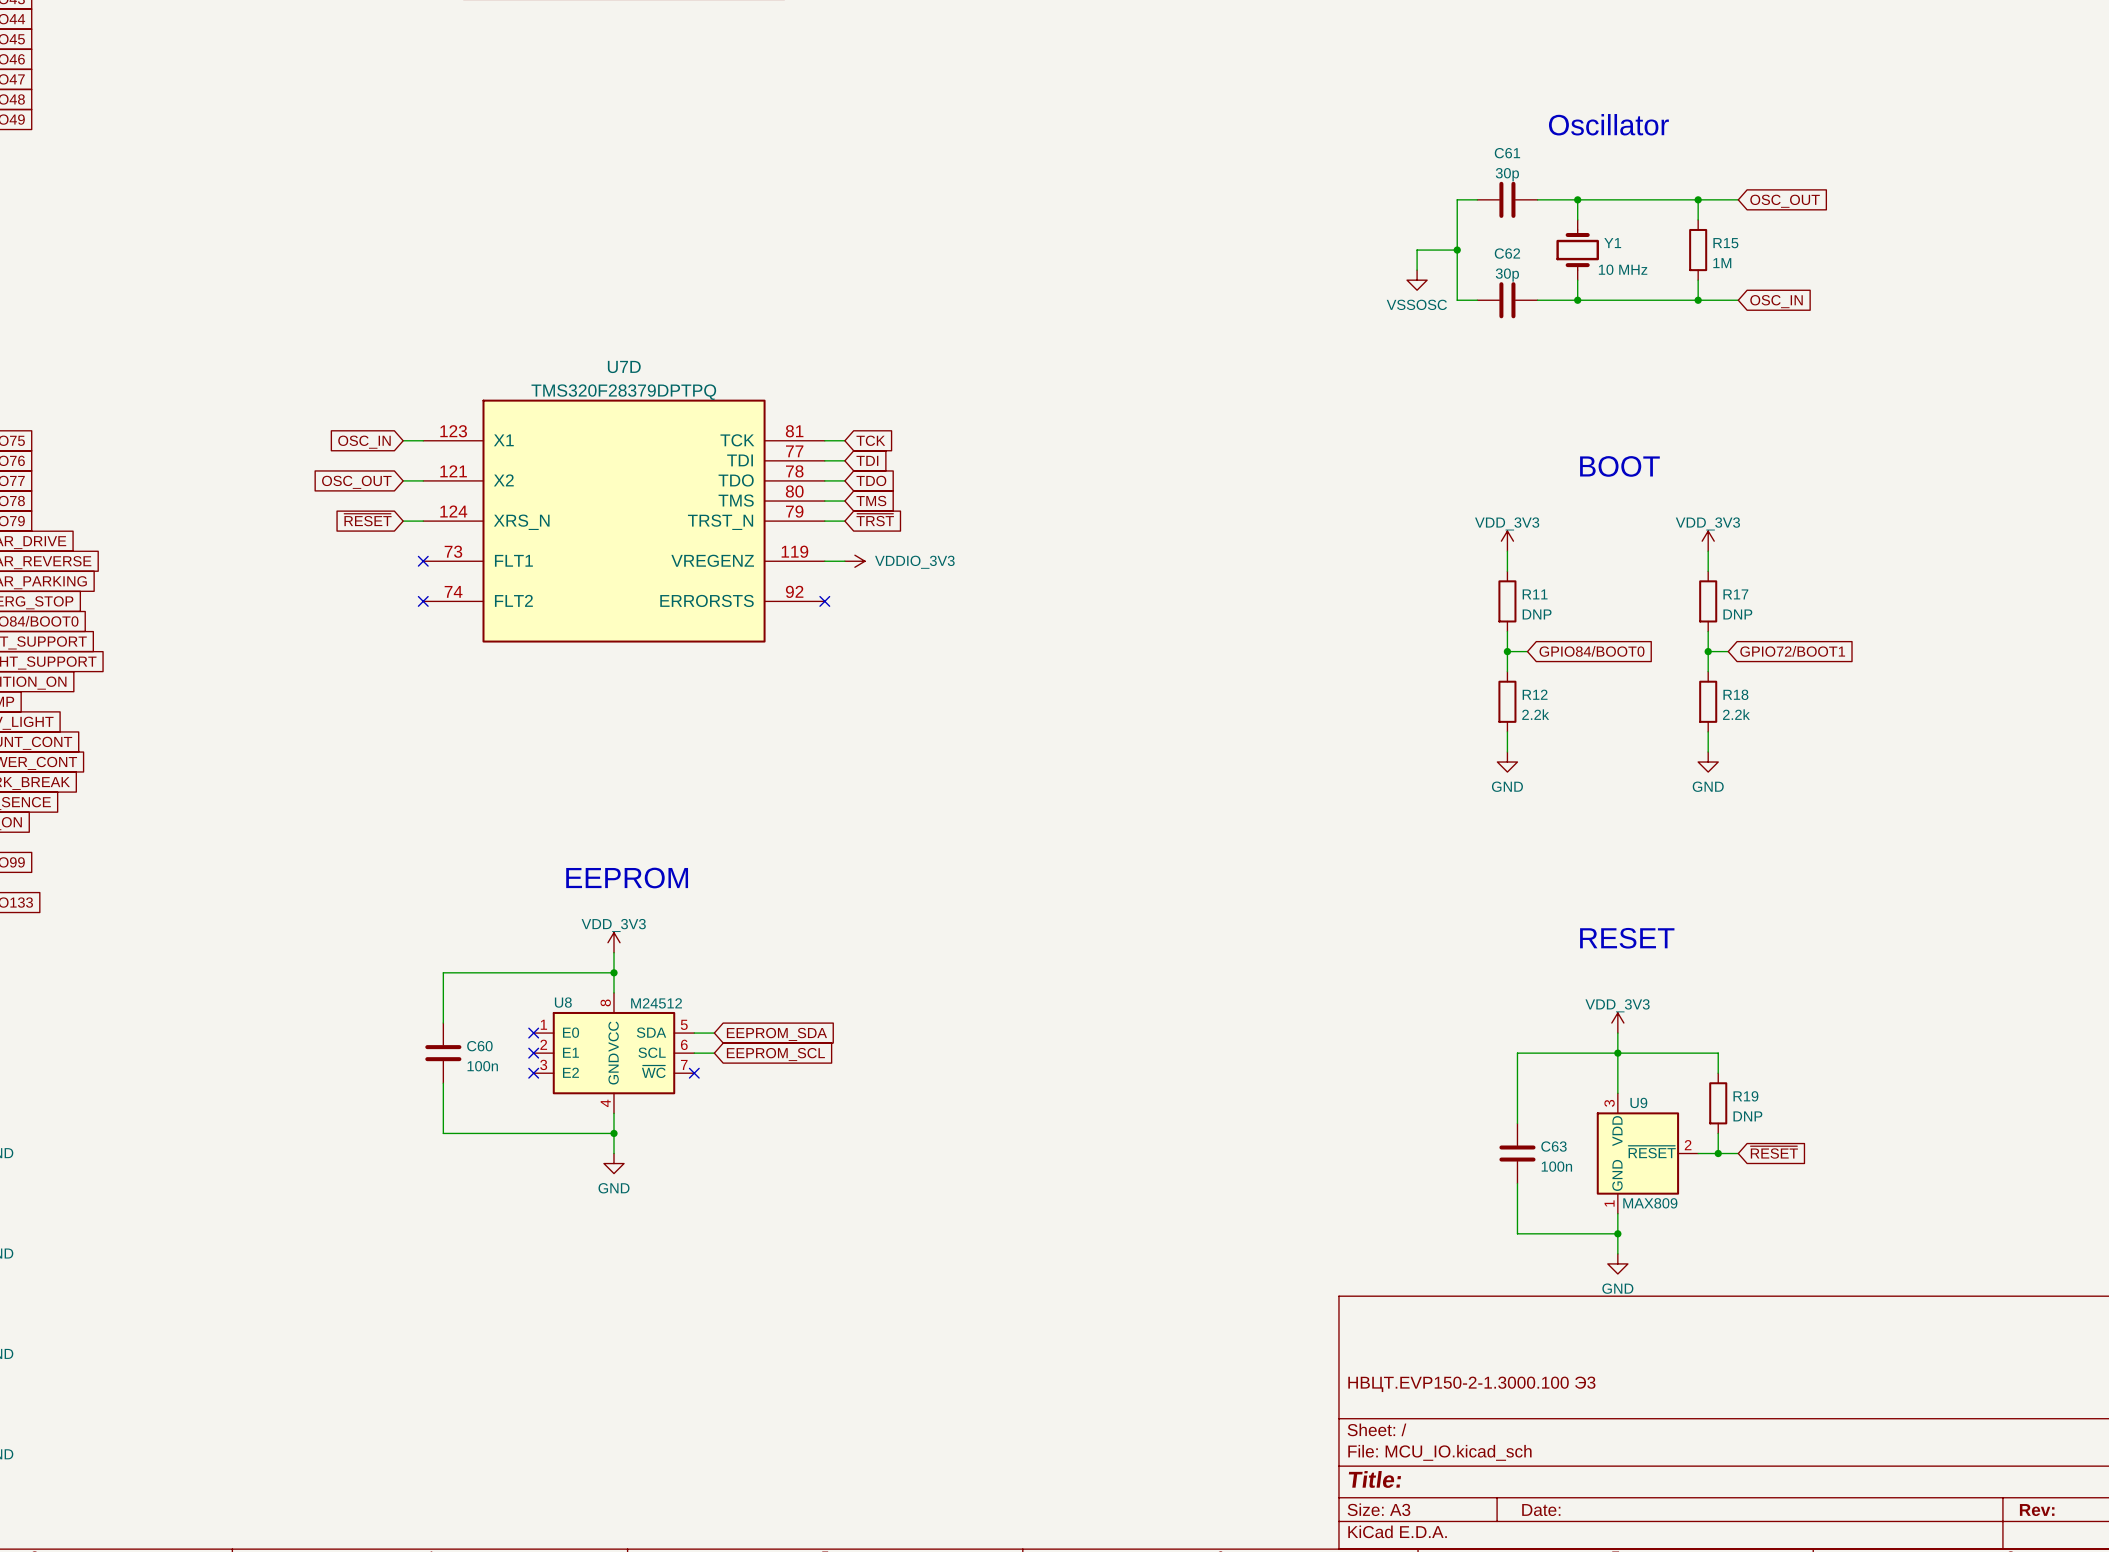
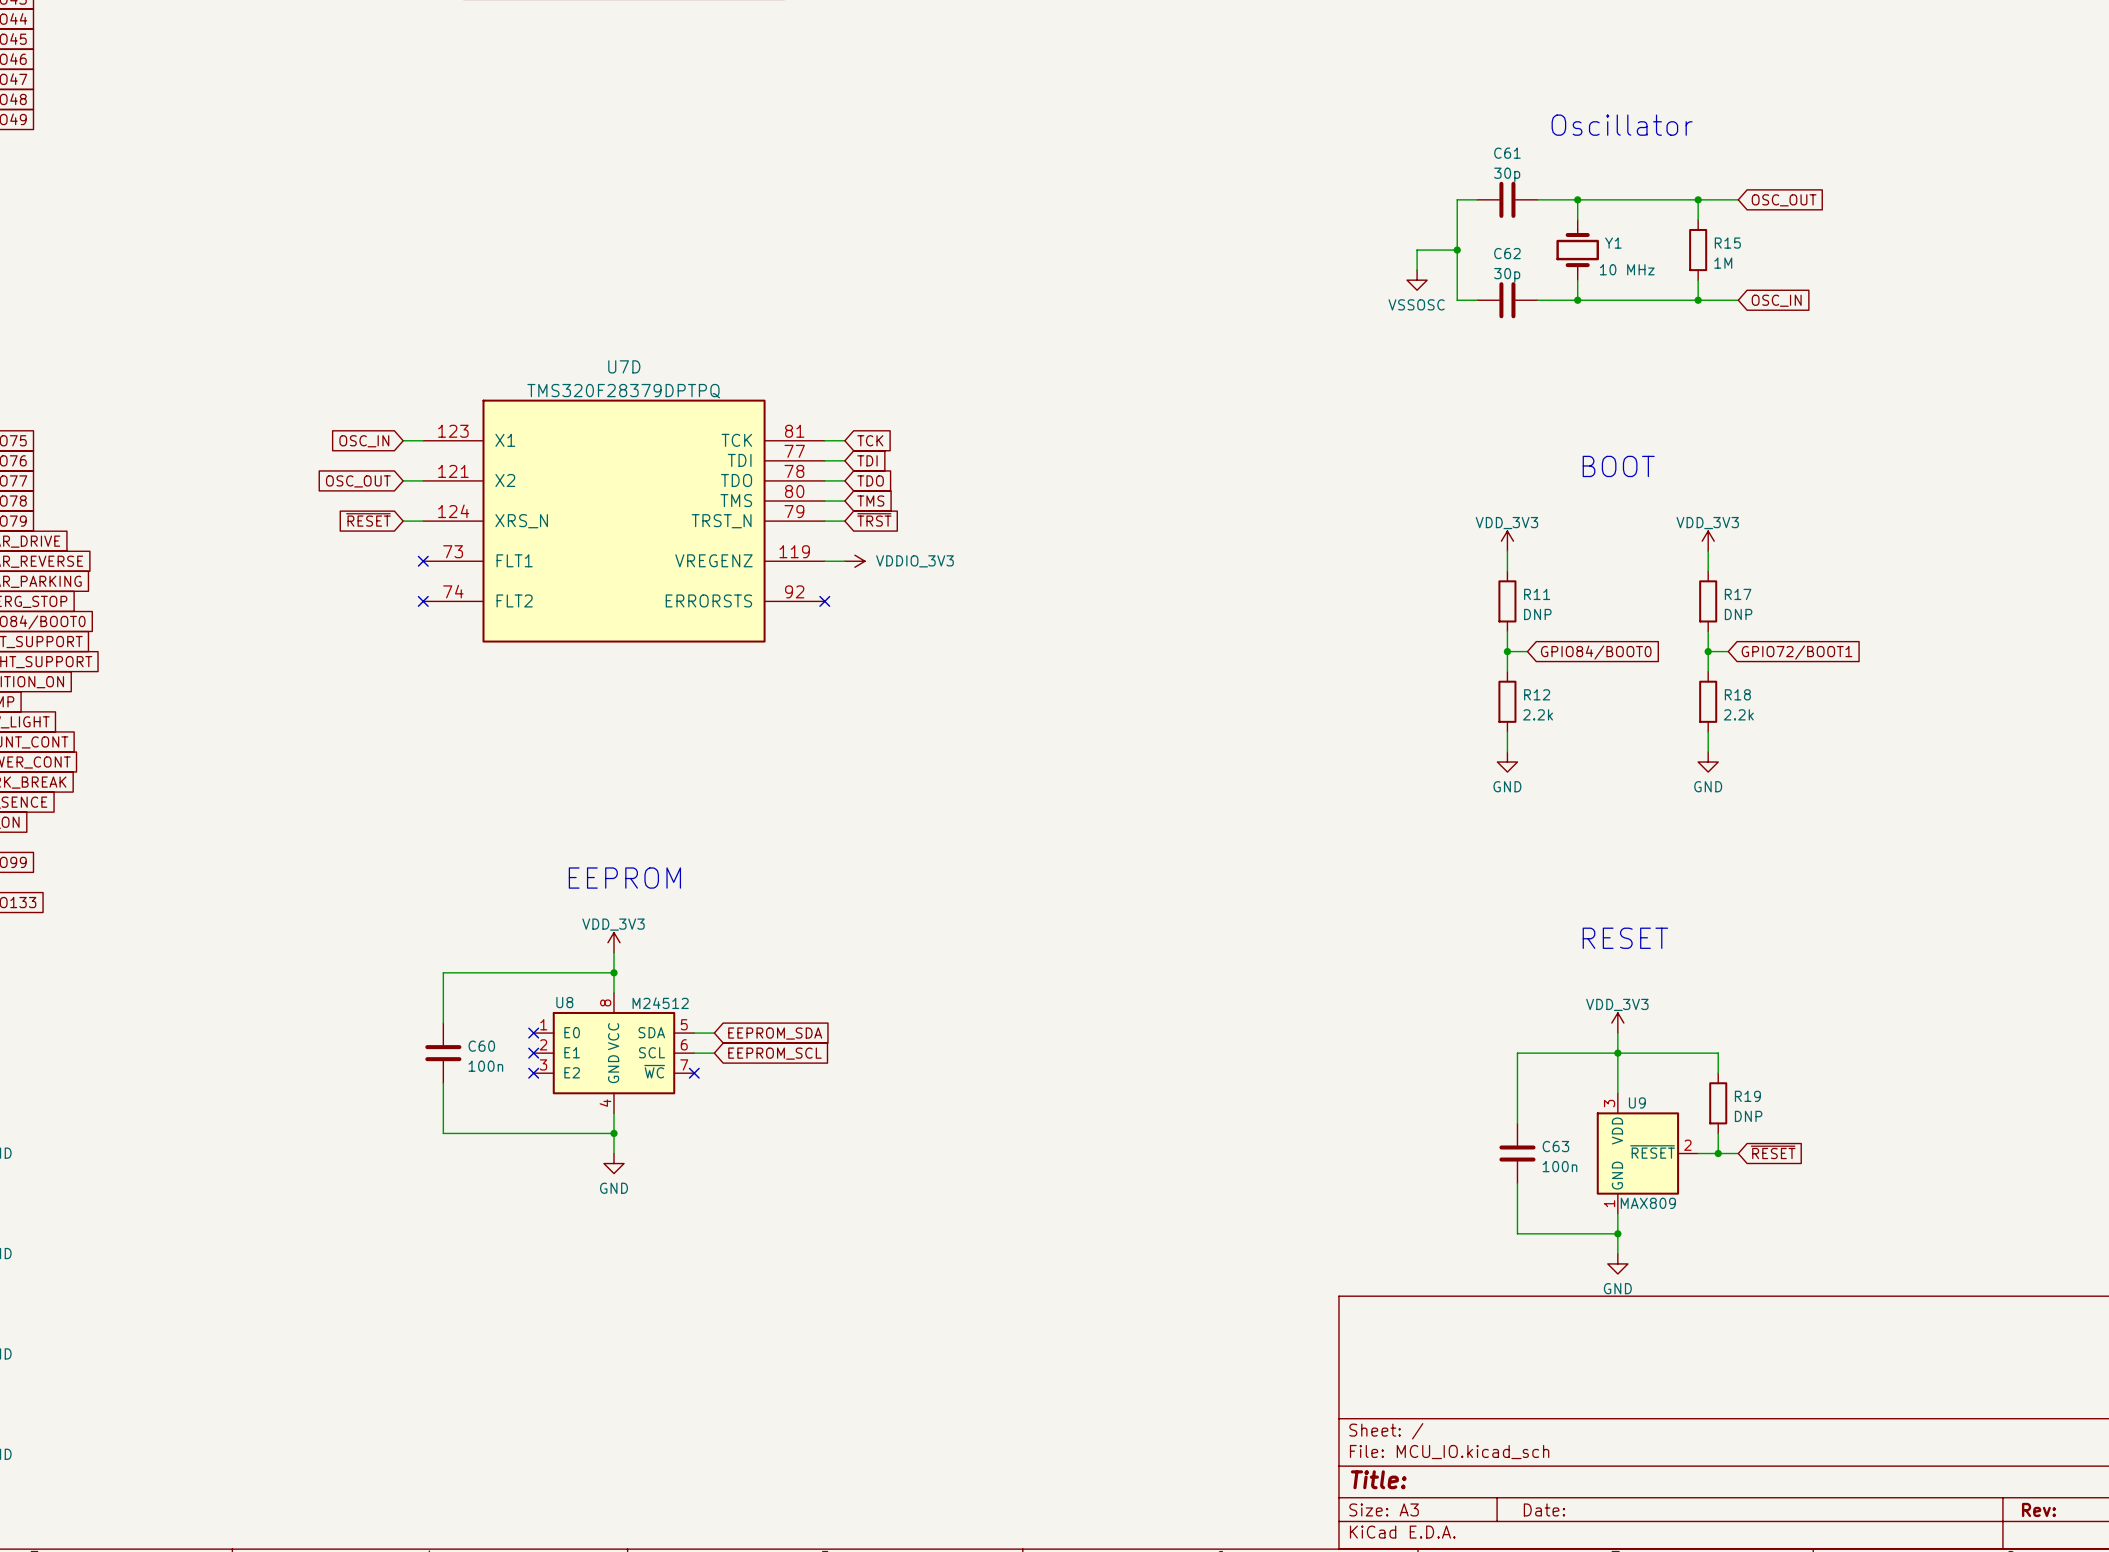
title block: НВЦТ.EVP150-2-1.3000.100 Э3 (1471, 1384) -> none

